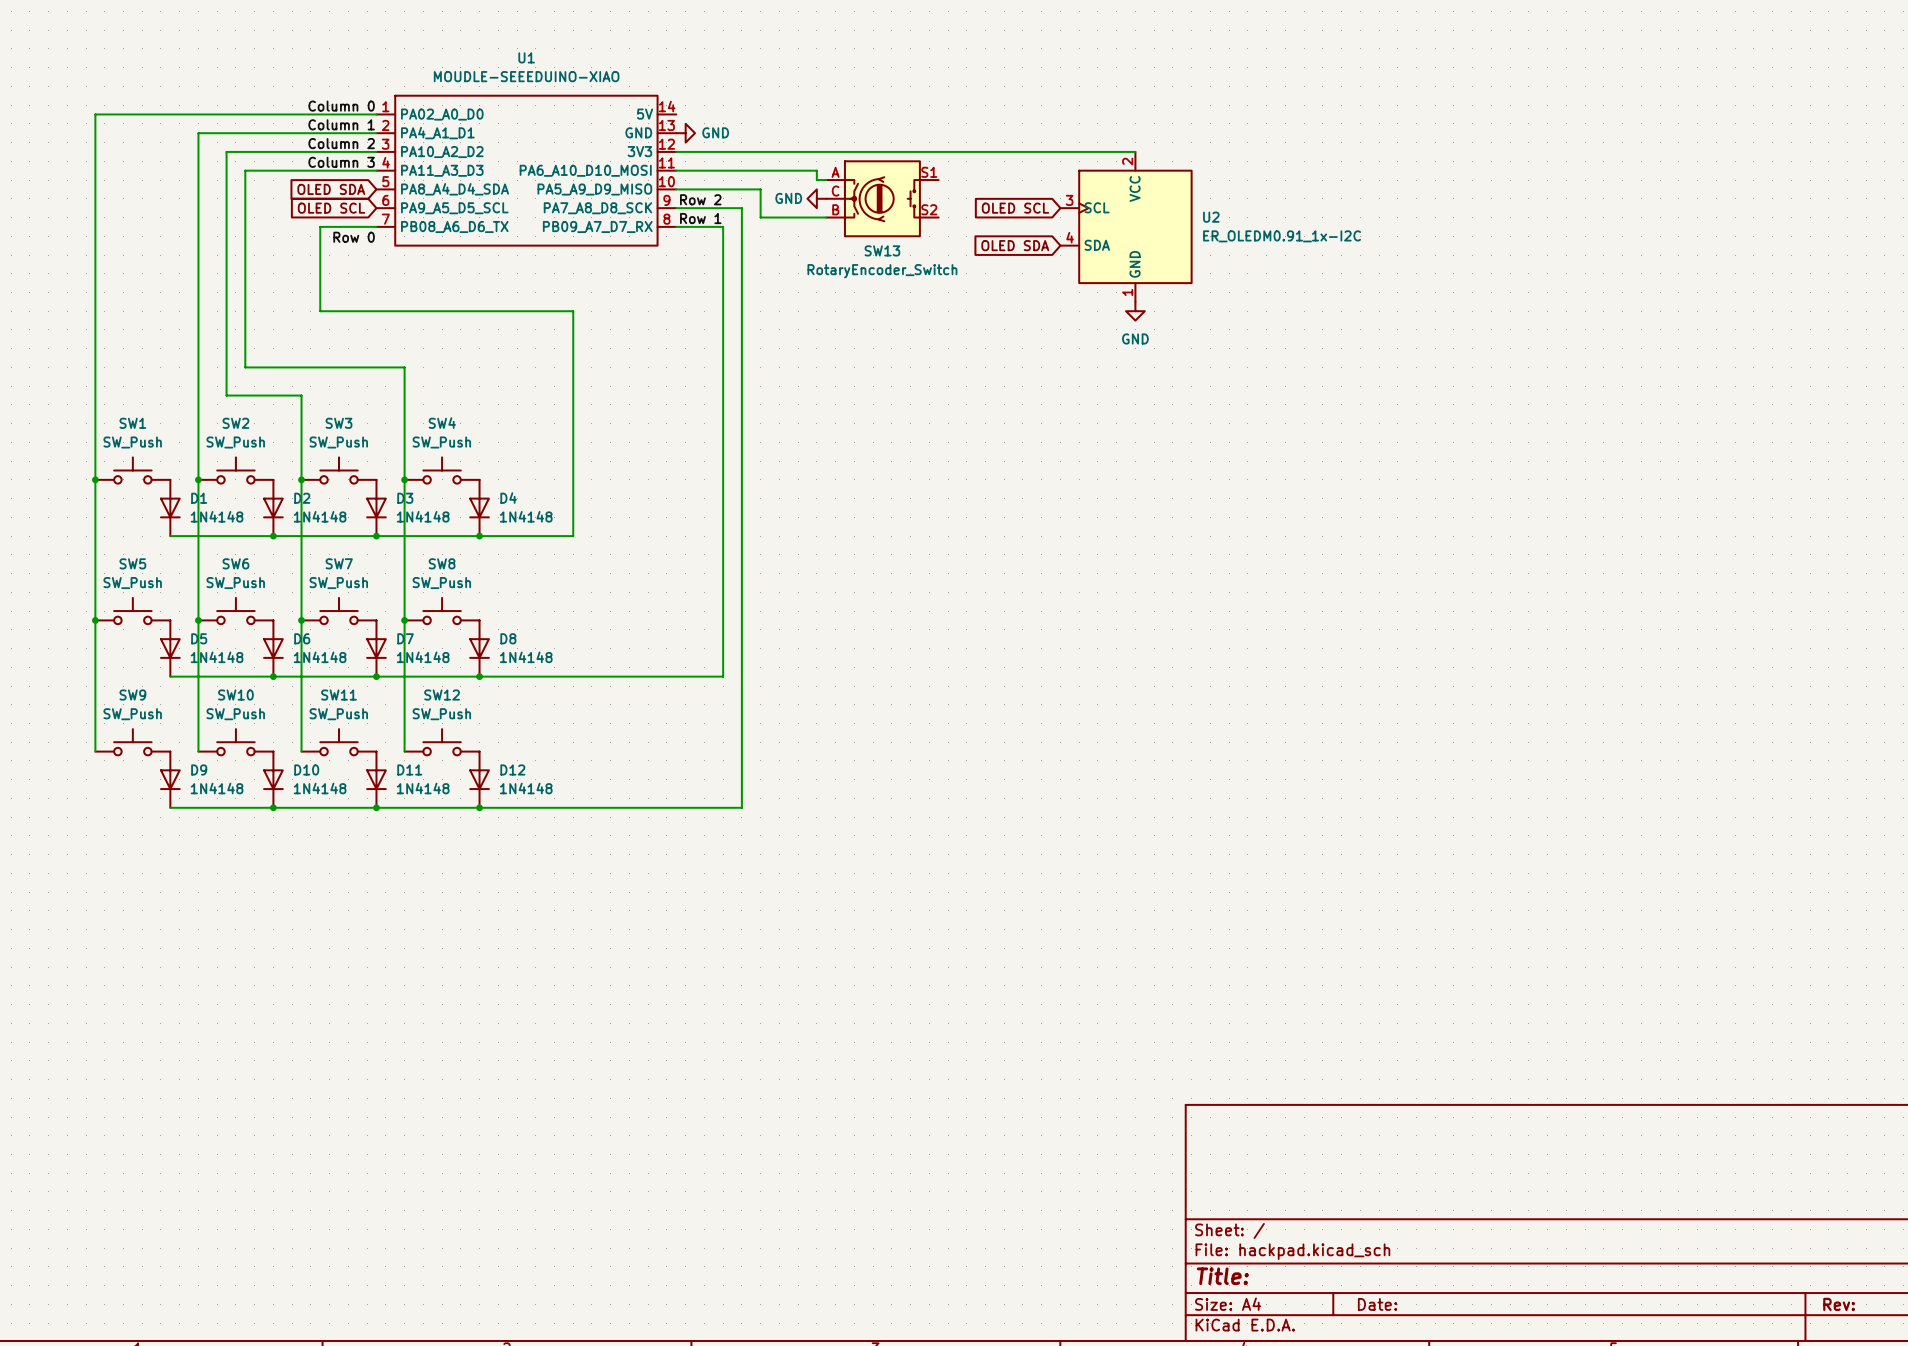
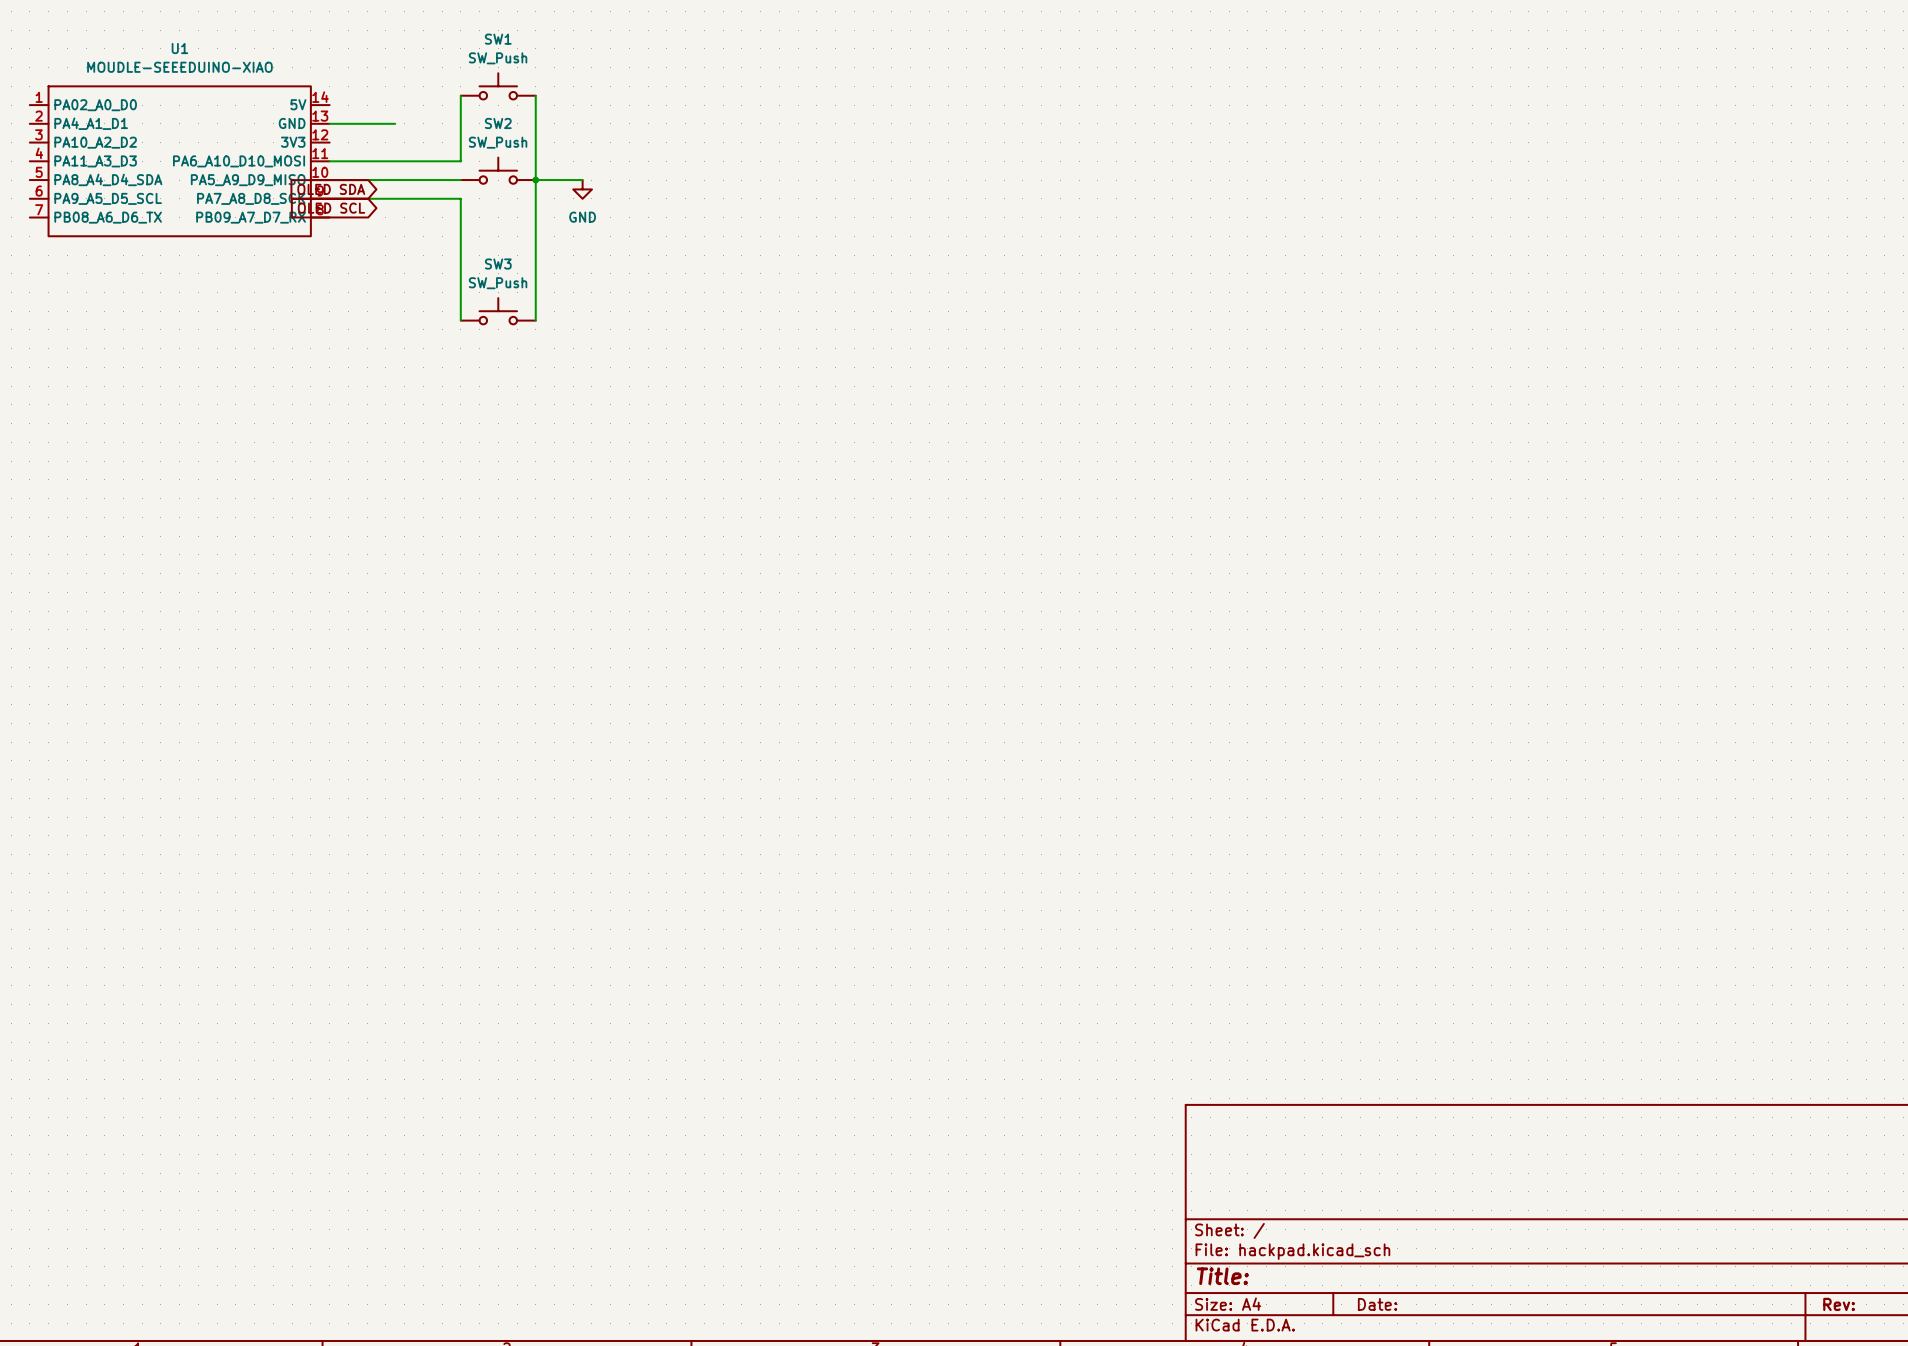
wire: none -> (460, 95) (460, 161) (329, 161)
wire: none -> (535, 95) (535, 320)
label: Column 0 (341, 106) -> none
wire: (376, 114) (95, 114) (95, 751) -> none
wire: none -> (329, 123) (395, 123)
label: Column 1 (341, 124) -> none
wire: (376, 133) (198, 133) (198, 751) -> none
power symbol: GND (685, 133) -> none
label: Column 2 (341, 143) -> none
wire: (376, 151) (226, 151) (226, 395) (301, 395) (301, 751) -> none
wire: (676, 151) (1135, 151) -> none
label: Column 3 (341, 162) -> none
wire: (376, 170) (245, 170) (245, 367) (404, 367) (404, 751) -> none
U1 position: (526, 170) -> (179, 161)
wire: (676, 170) (816, 170) (816, 180) (826, 180) -> none
wire: none -> (329, 180) (460, 180)
wire: none -> (535, 180) (582, 180)
junction: none -> (535, 180)
power symbol: none -> GND (582, 189)
wire: (676, 189) (760, 189) (760, 217) (826, 217) -> none
wire: none -> (329, 198) (460, 198) (460, 320)
power symbol: GND (816, 198) -> none
SW13: RotaryEncoder_Switch (882, 198) -> none
label: Row 2 (700, 199) -> none
wire: (676, 208) (741, 208) (741, 807) (170, 807) -> none
global label: OLED SCL (1015, 208) -> none
label: Row 1 (700, 218) -> none
wire: (376, 226) (320, 226) (320, 311) (573, 311) (573, 536) (170, 536) -> none
wire: (676, 226) (723, 226) (723, 676) (170, 676) -> none
U2: ER_OLEDM0.91_1x-I2C (1126, 226) -> none
label: Row 0 (354, 237) -> none
global label: OLED SDA (1015, 245) -> none
power symbol: GND (1135, 311) -> none
SW1 position: (132, 470) -> (498, 86)
SW2 position: (235, 470) -> (498, 170)
SW3 position: (339, 470) -> (498, 311)
SW4: SW_Push (442, 470) -> none
junction: (95, 479) -> none
junction: (198, 479) -> none
junction: (301, 479) -> none
junction: (404, 479) -> none
D1: 1N4148 (170, 507) -> none
D2: 1N4148 (273, 507) -> none
D3: 1N4148 (376, 507) -> none
D4: 1N4148 (479, 507) -> none
junction: (273, 536) -> none
junction: (376, 536) -> none
junction: (479, 536) -> none
SW5: SW_Push (132, 611) -> none
SW6: SW_Push (235, 611) -> none
SW7: SW_Push (339, 611) -> none
SW8: SW_Push (442, 611) -> none
junction: (95, 620) -> none
junction: (198, 620) -> none
junction: (301, 620) -> none
junction: (404, 620) -> none
D5: 1N4148 (170, 648) -> none
D6: 1N4148 (273, 648) -> none
D7: 1N4148 (376, 648) -> none
D8: 1N4148 (479, 648) -> none
junction: (273, 676) -> none
junction: (376, 676) -> none
junction: (479, 676) -> none
SW9: SW_Push (132, 742) -> none
SW10: SW_Push (235, 742) -> none
SW11: SW_Push (339, 742) -> none
SW12: SW_Push (442, 742) -> none
D9: 1N4148 (170, 779) -> none
D10: 1N4148 (273, 779) -> none
D11: 1N4148 (376, 779) -> none
D12: 1N4148 (479, 779) -> none
junction: (273, 807) -> none
junction: (376, 807) -> none
junction: (479, 807) -> none

